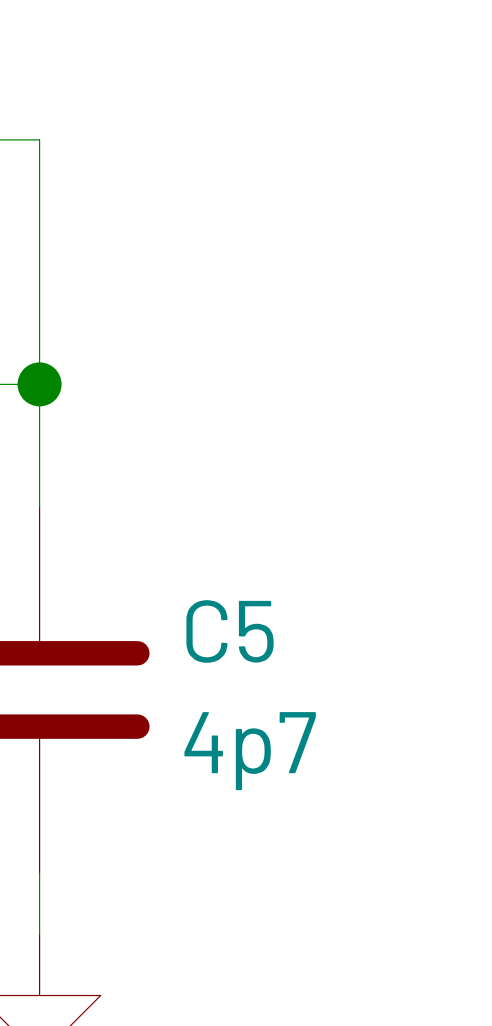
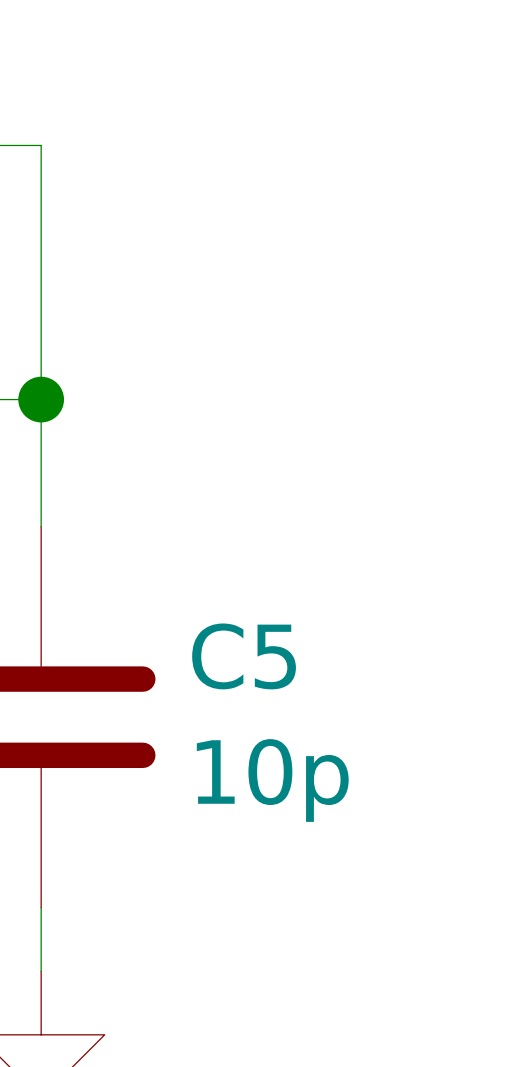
C5 value: 4p7 (250, 751) -> 10p (272, 780)

